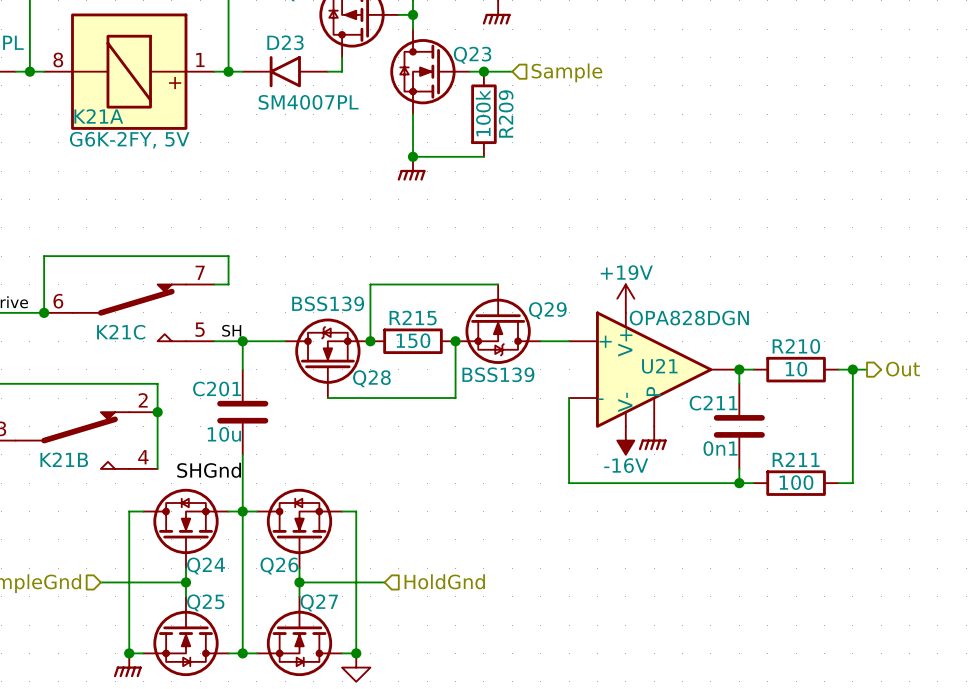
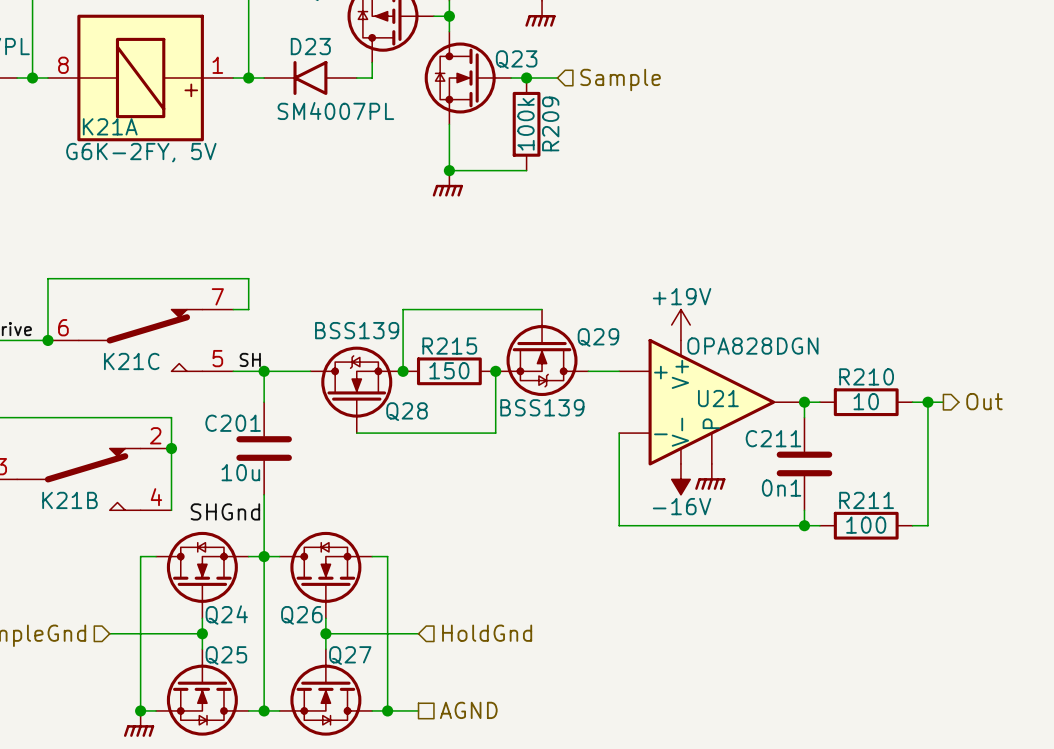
hierarchical label: none -> AGND (468, 710)
wire: none -> (387, 710) (418, 710)
power symbol: (356, 667) -> none

